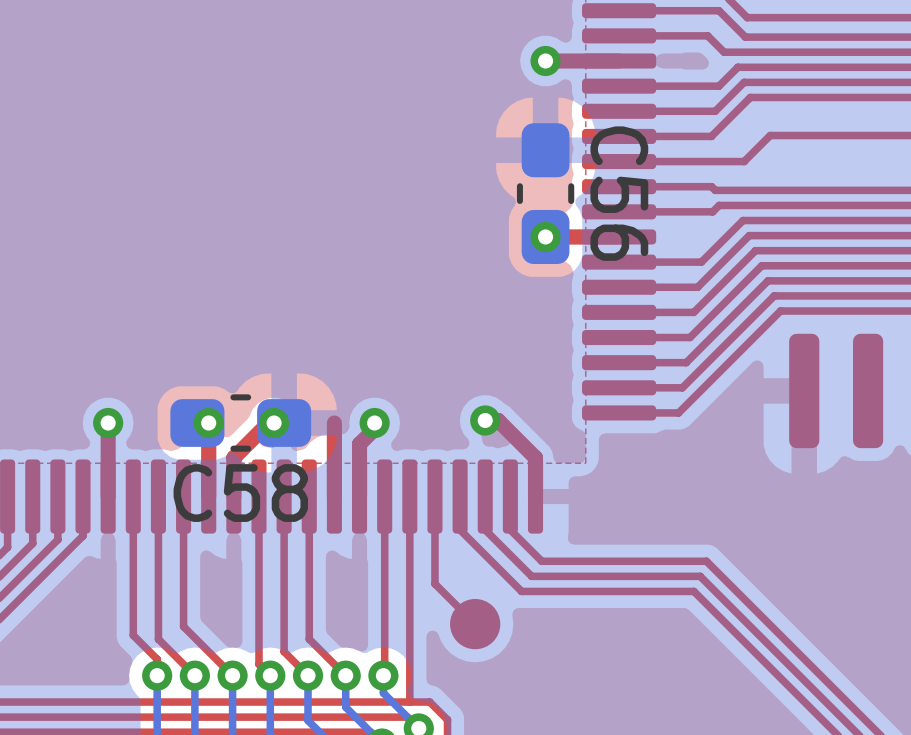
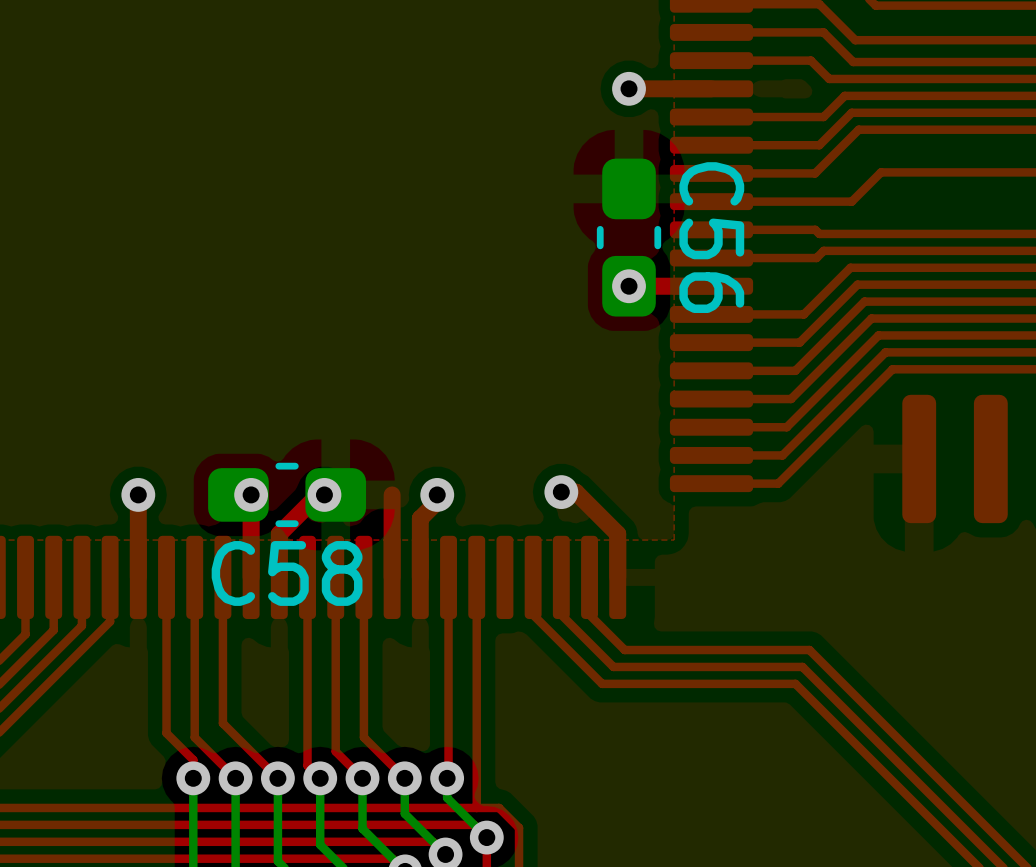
top track: (434, 496) (434, 583) (475, 624) -> none
part: (475, 624) -> none

